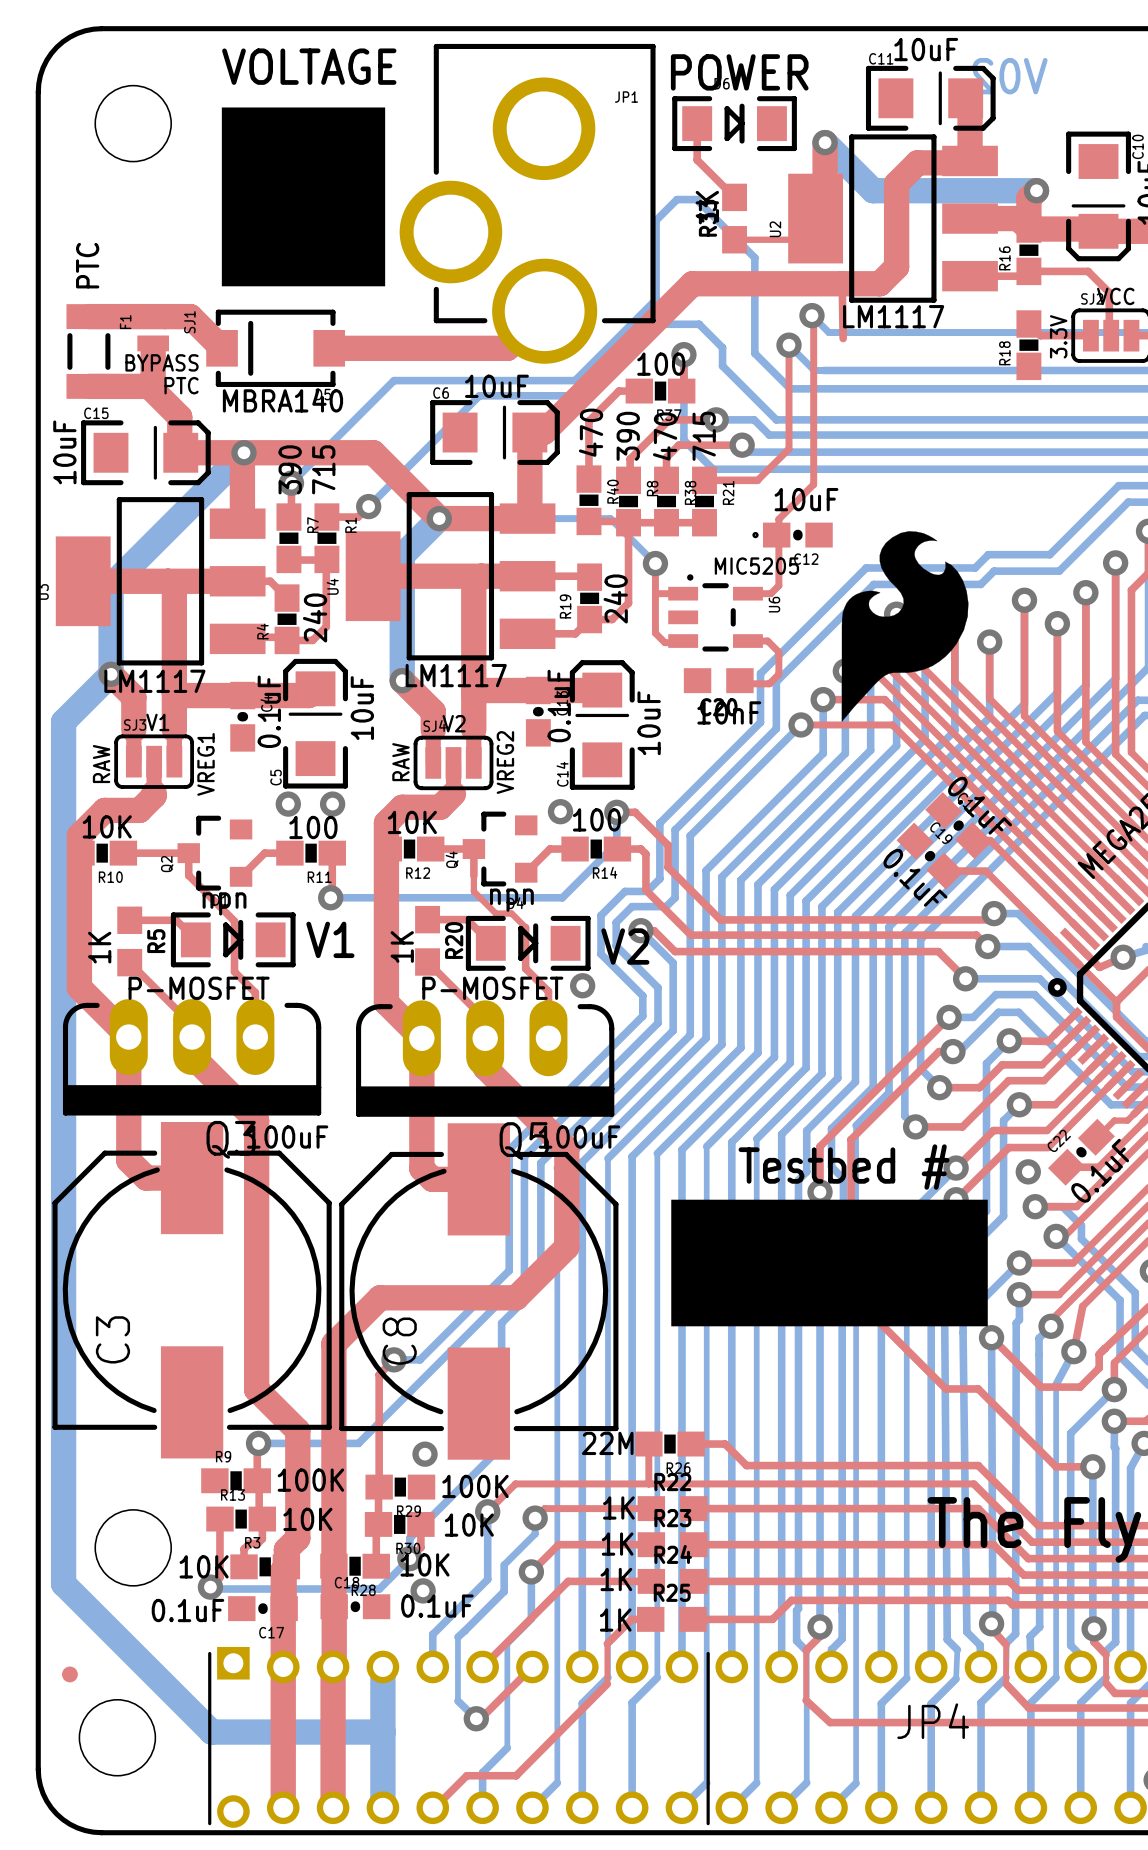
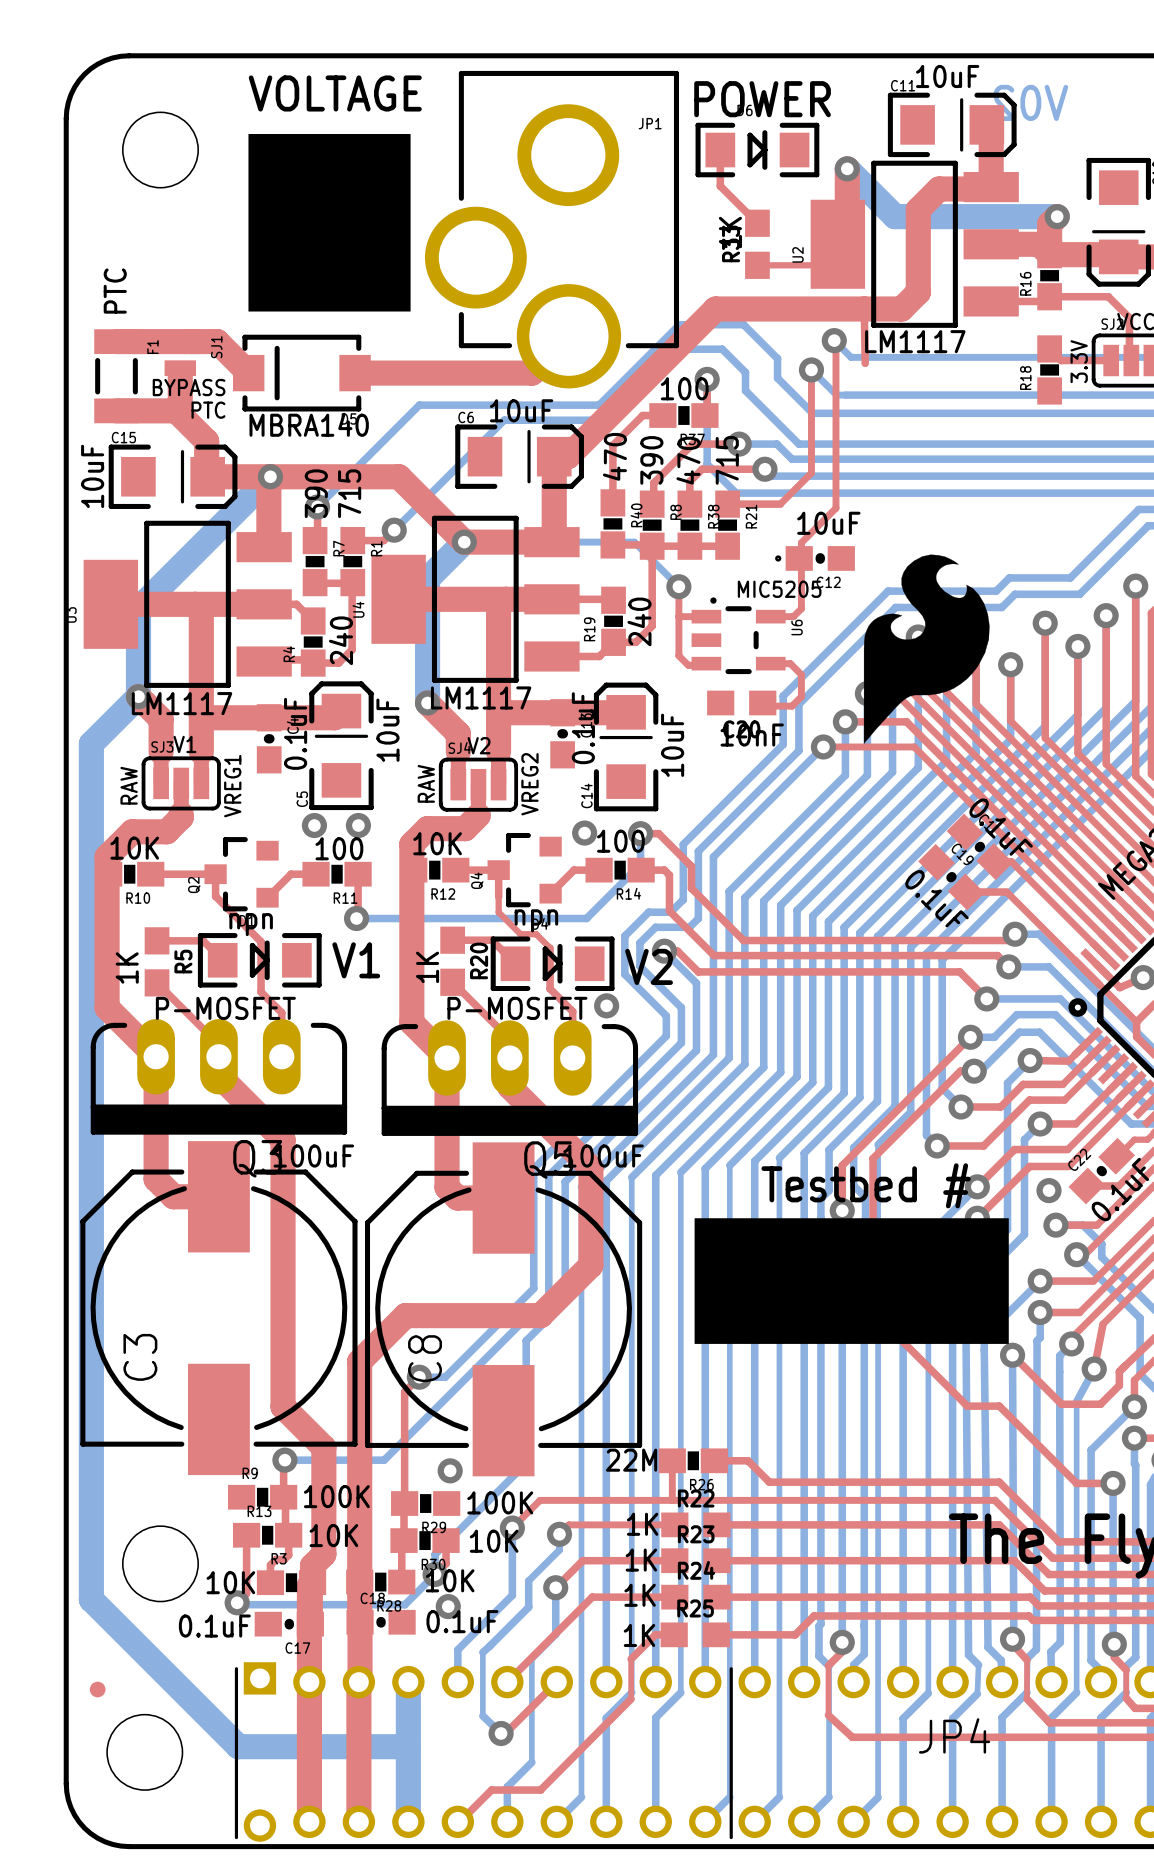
bottom track: (656, 299) (656, 220) (676, 199) (696, 199) (754, 257) (754, 333) -> (679, 324) (743, 324) (777, 358)

